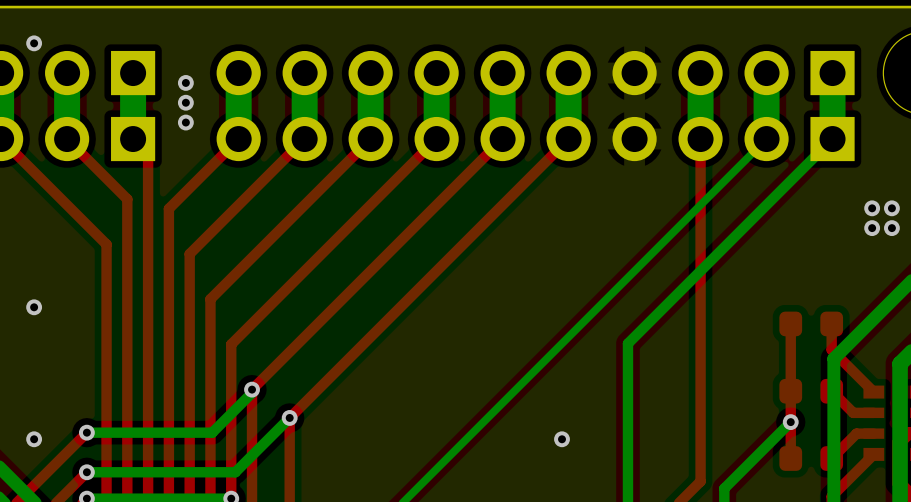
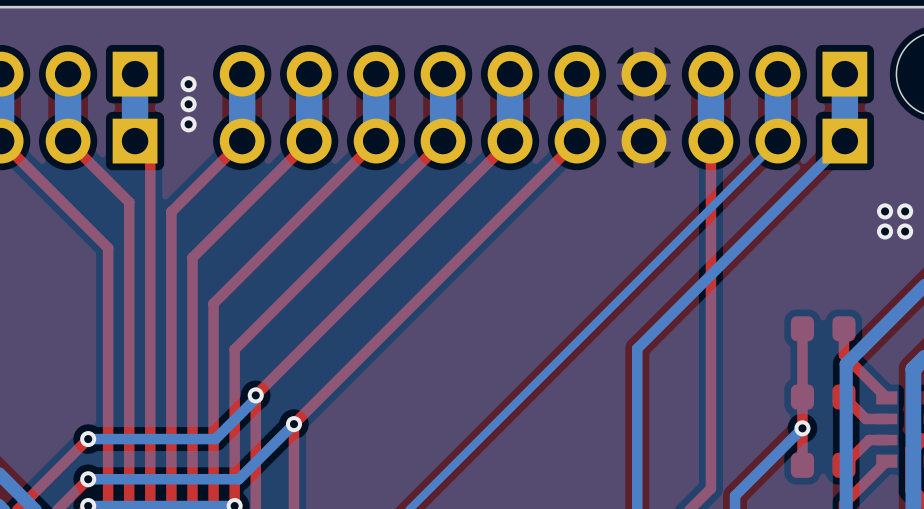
via: (34, 43) -> none
via: (34, 307) -> none
via: (34, 439) -> none
via: (562, 439) -> none

